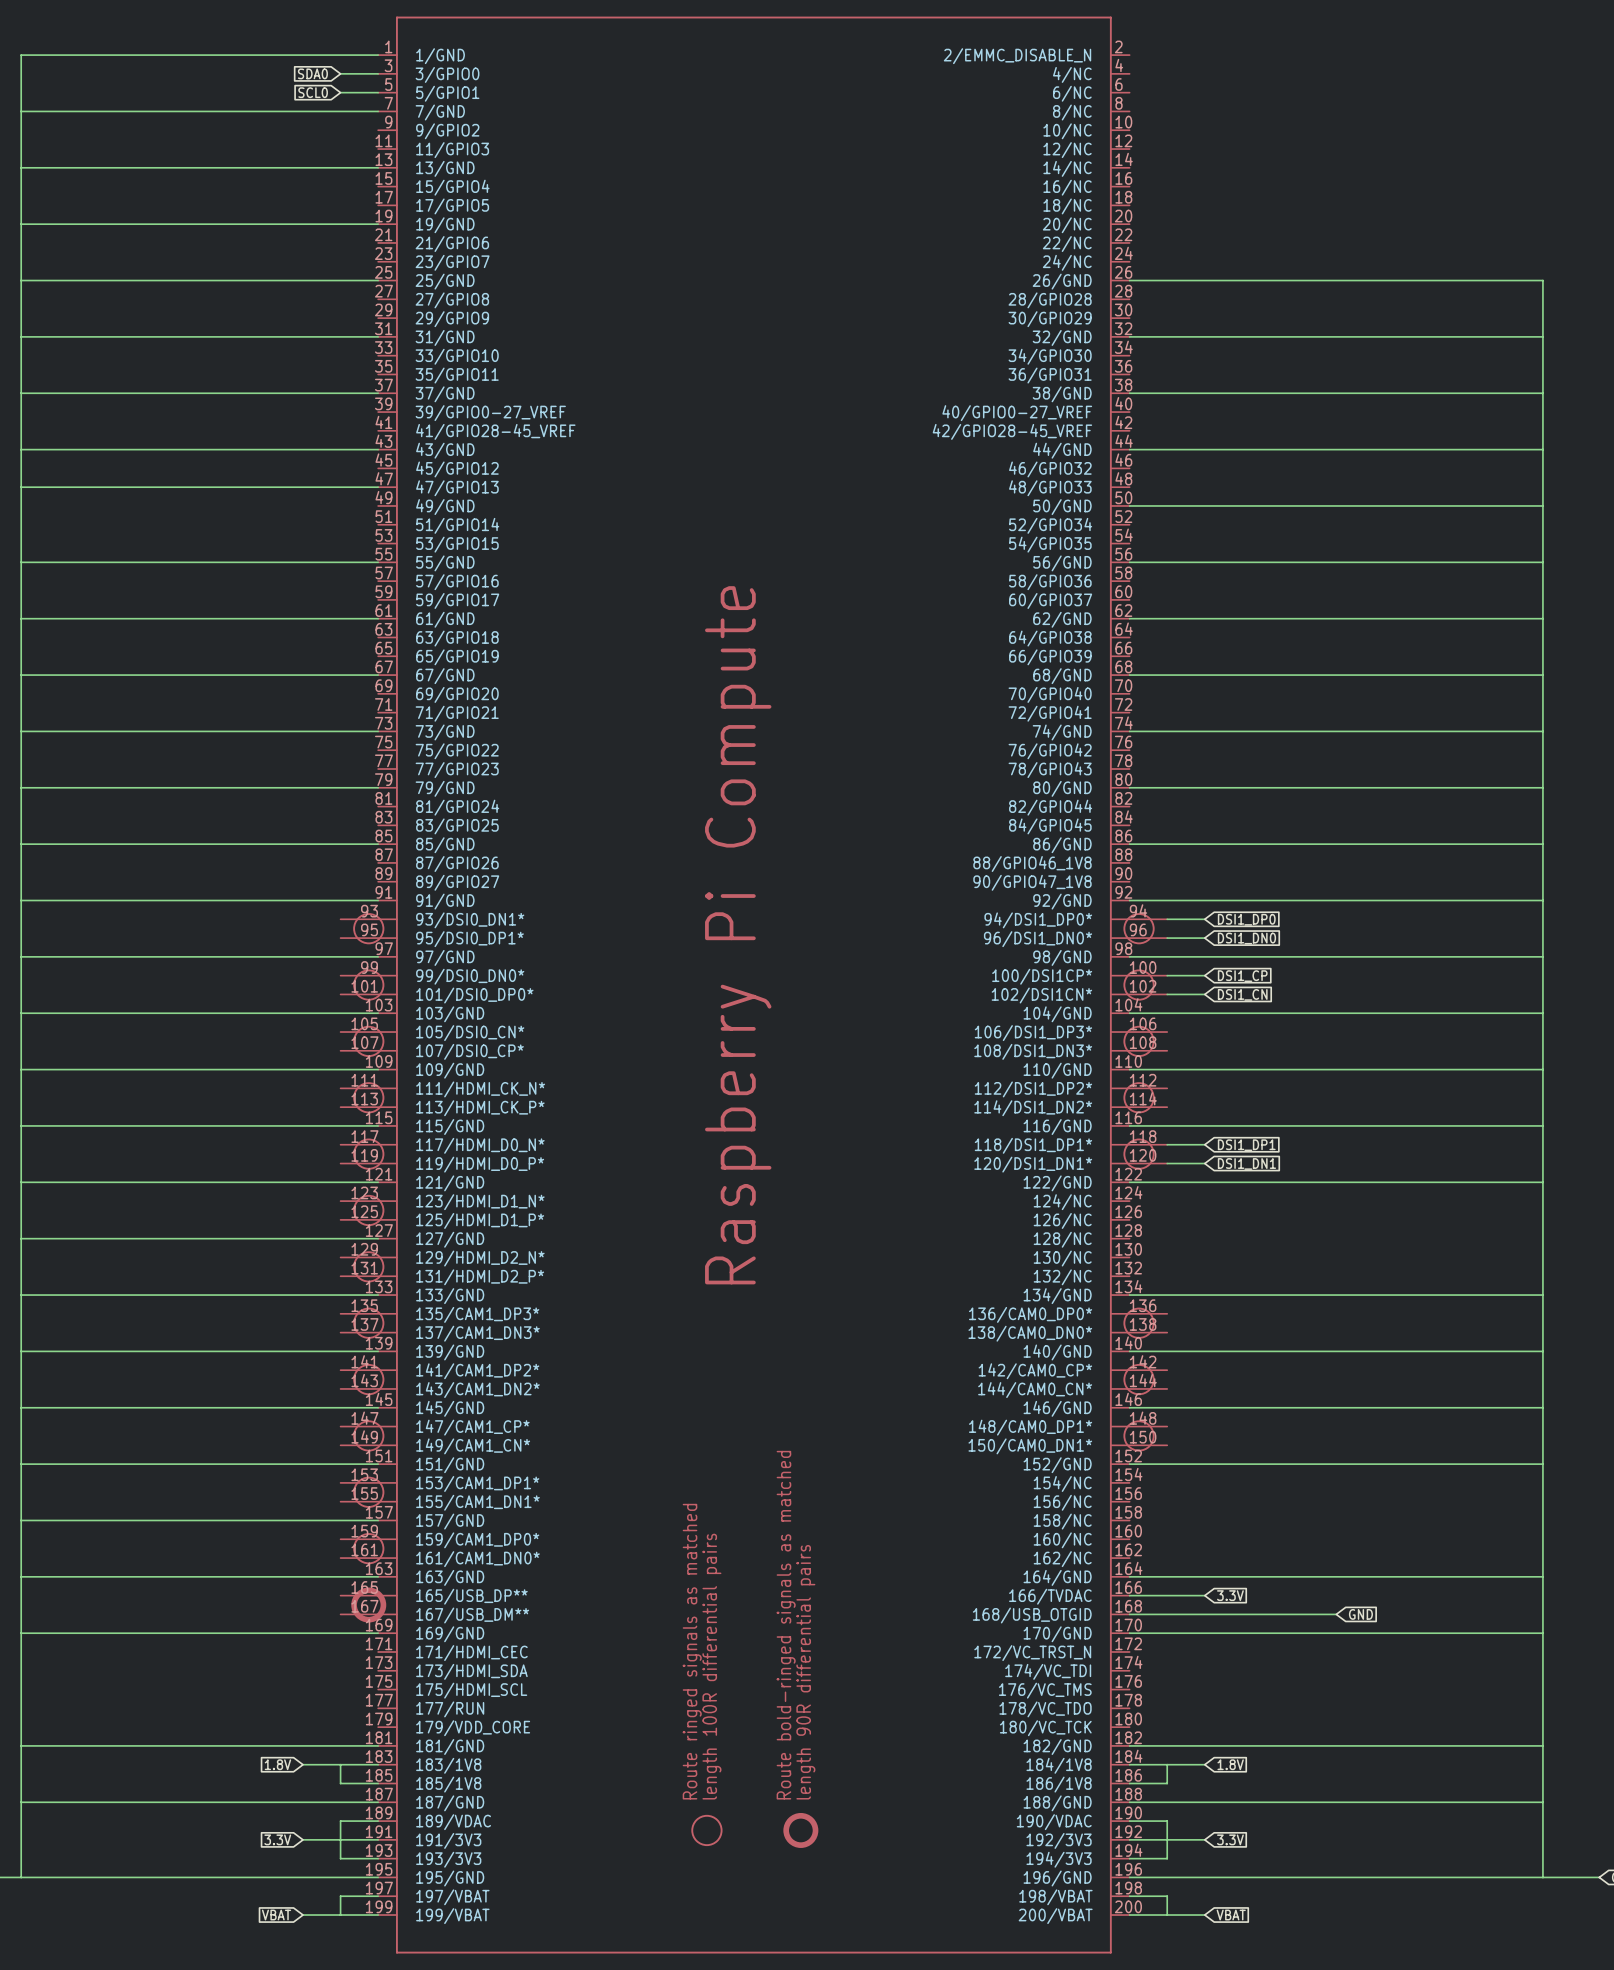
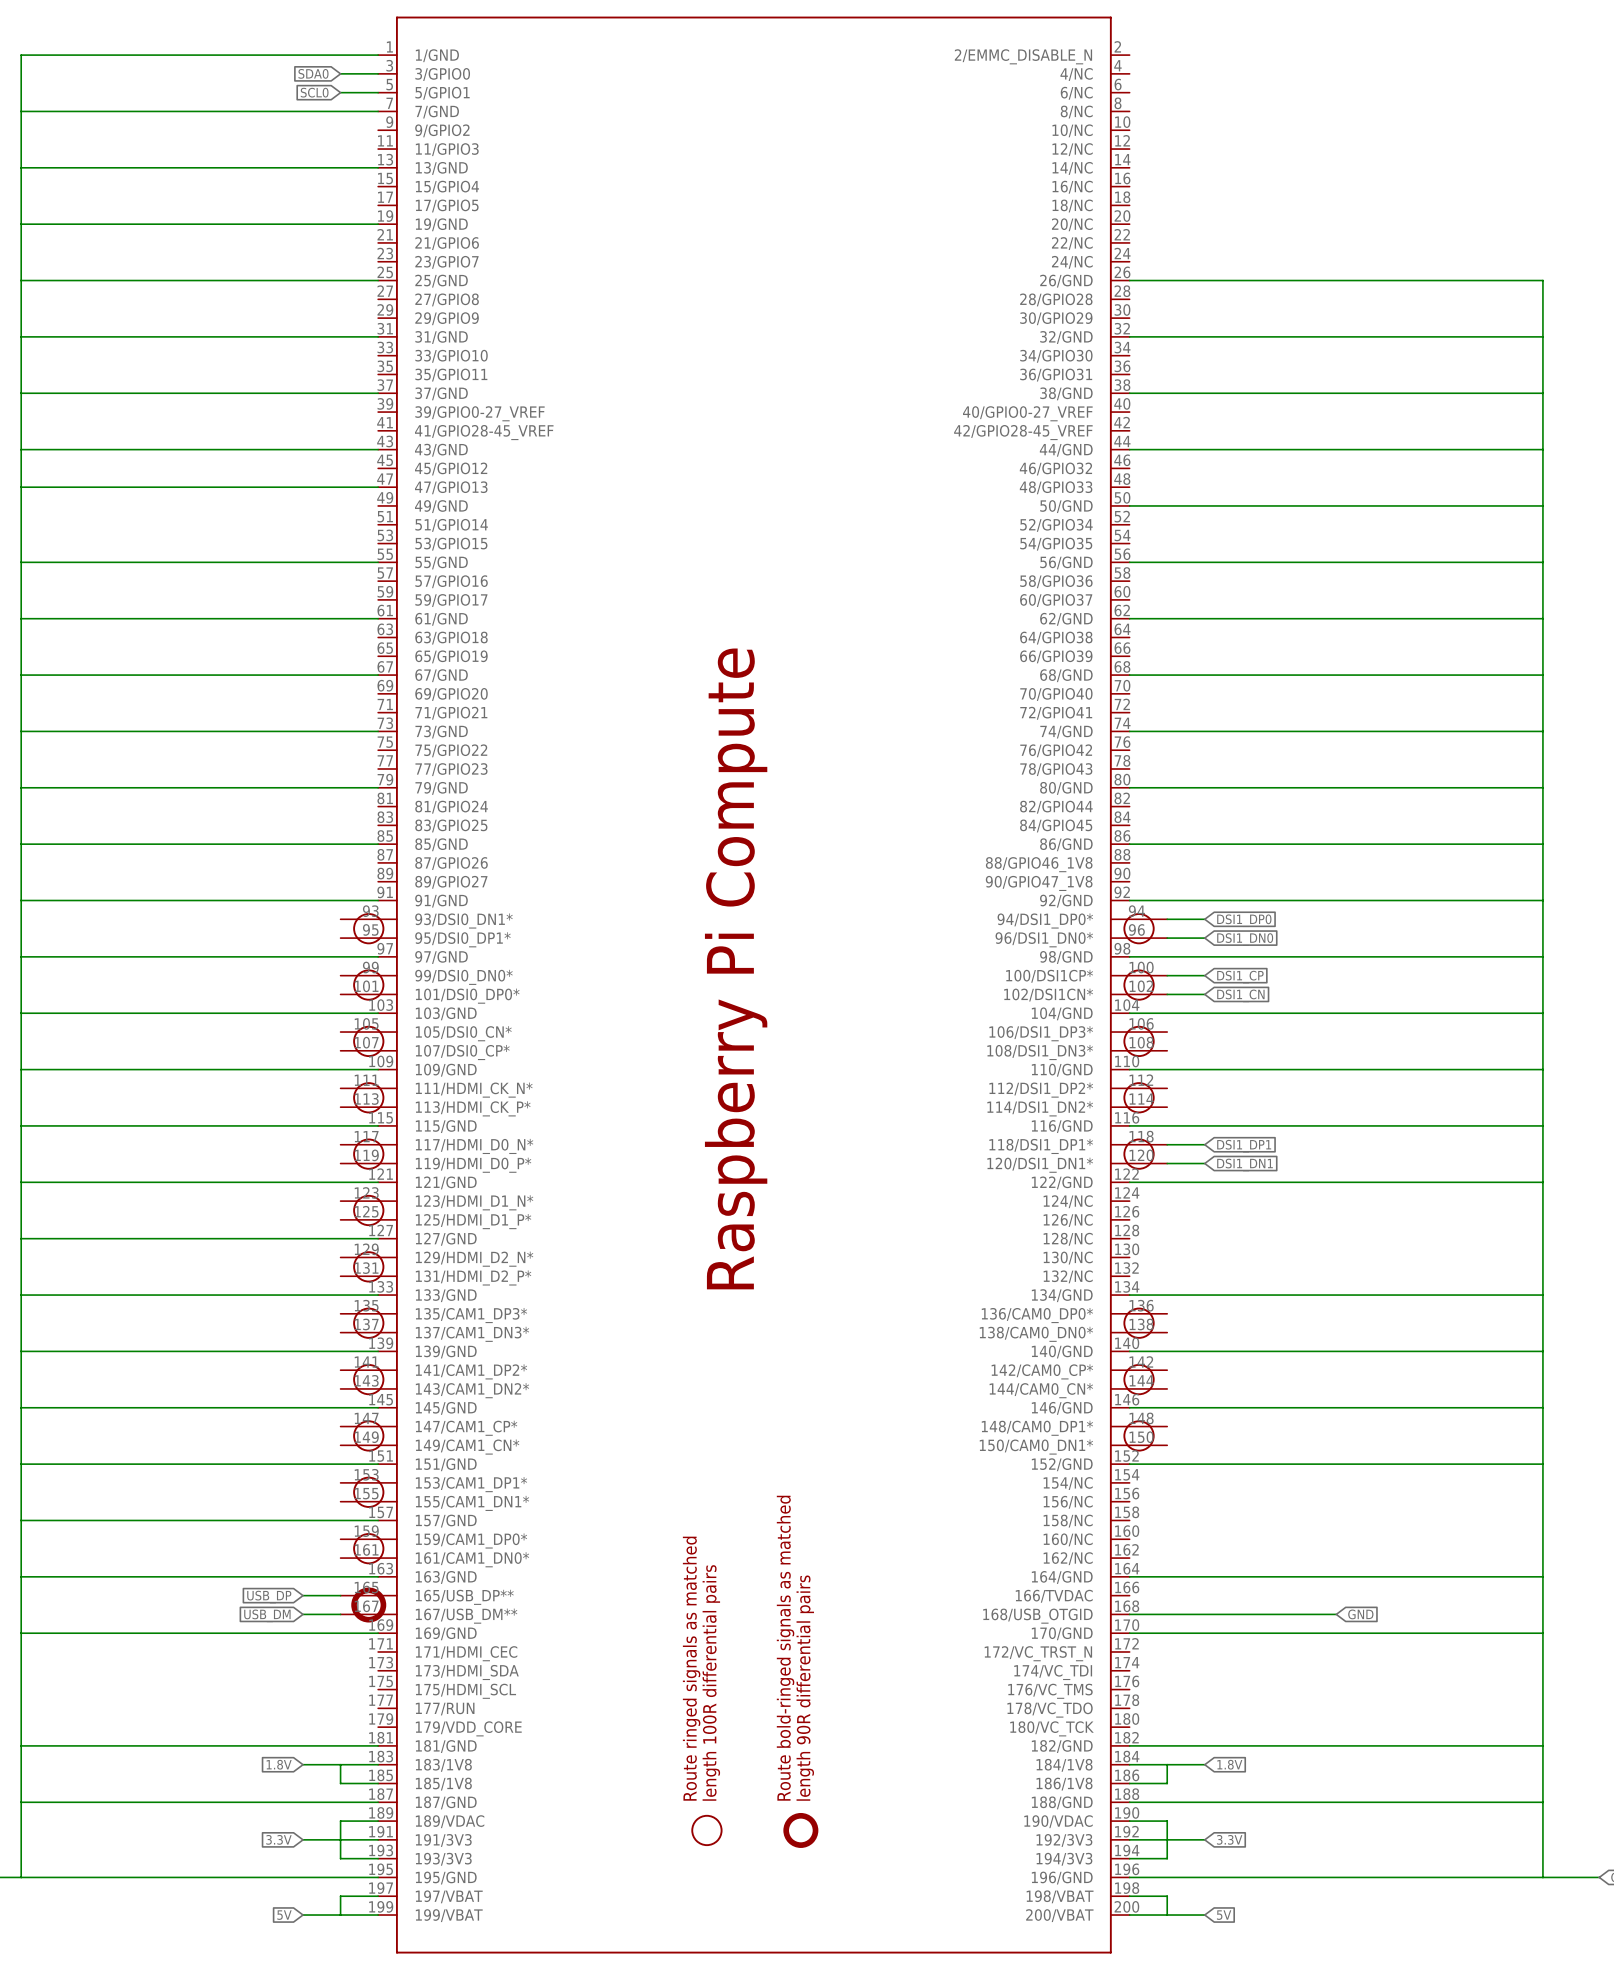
wire: none -> (303, 1595) (340, 1595)
wire: (1129, 1595) (1204, 1595) -> none
global label: 3.3V (1230, 1595) -> none
global label: none -> USB_DP (269, 1597)
global label: none -> USB_DM (267, 1615)
wire: none -> (303, 1614) (340, 1614)
global label: VBAT (276, 1915) -> 5V (284, 1915)
global label: VBAT (1231, 1915) -> 5V (1224, 1915)

